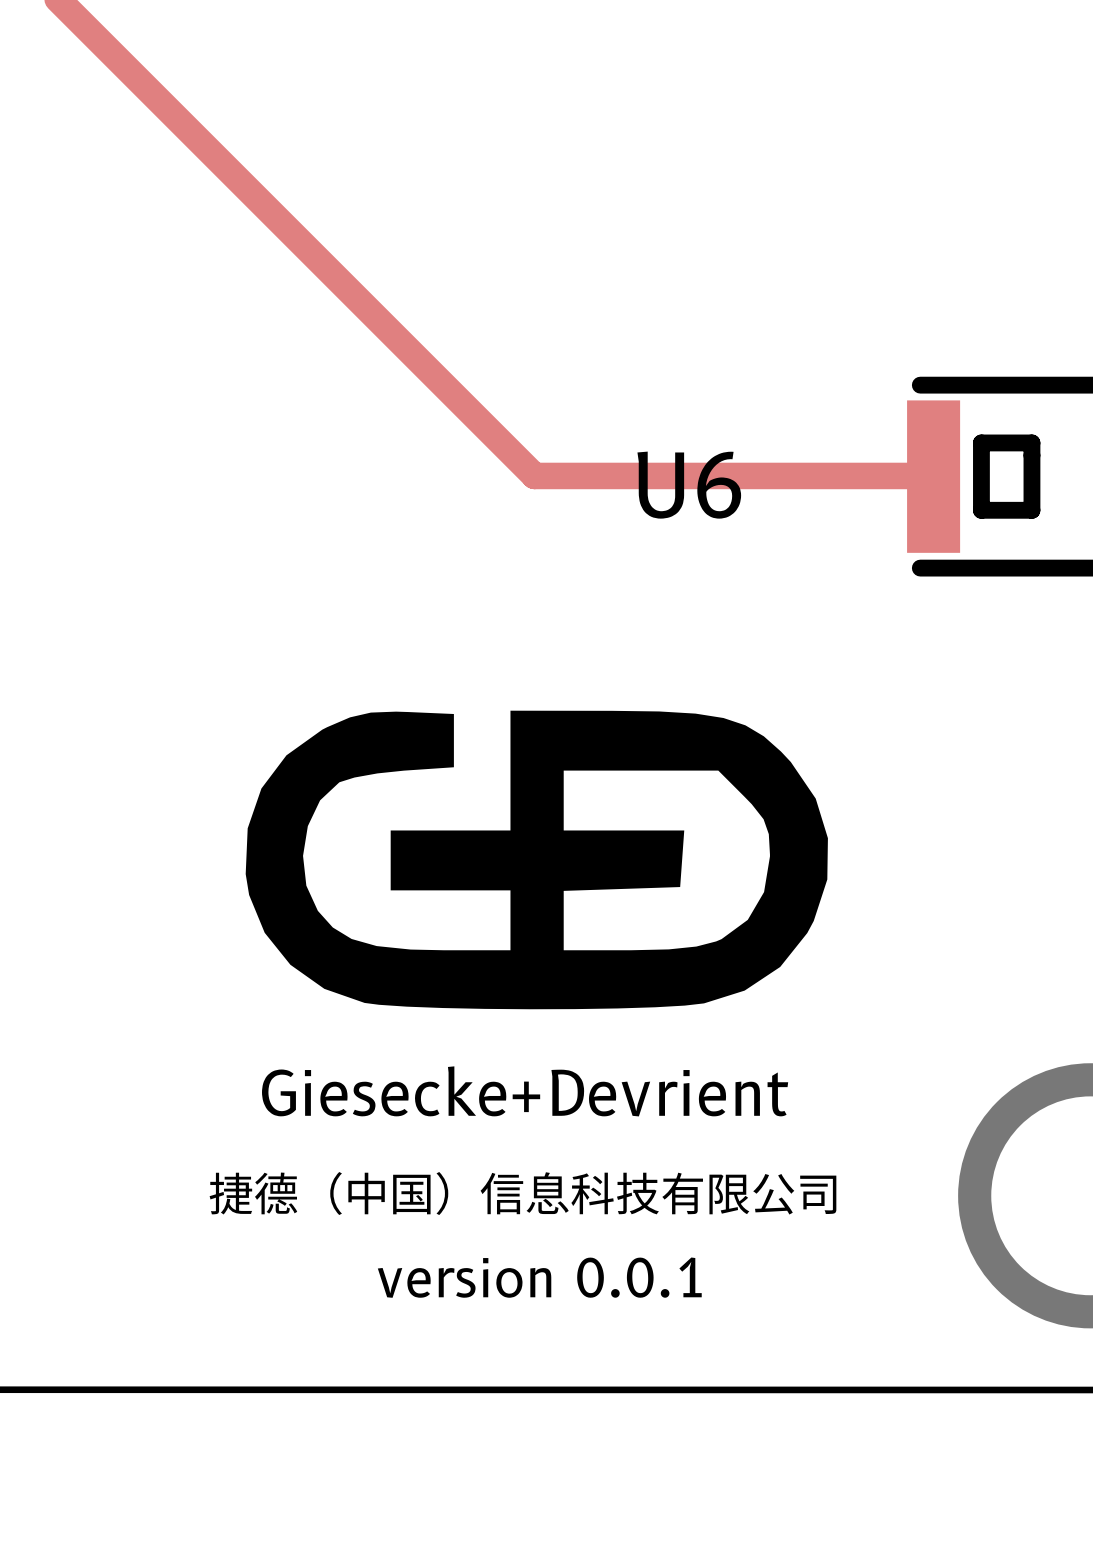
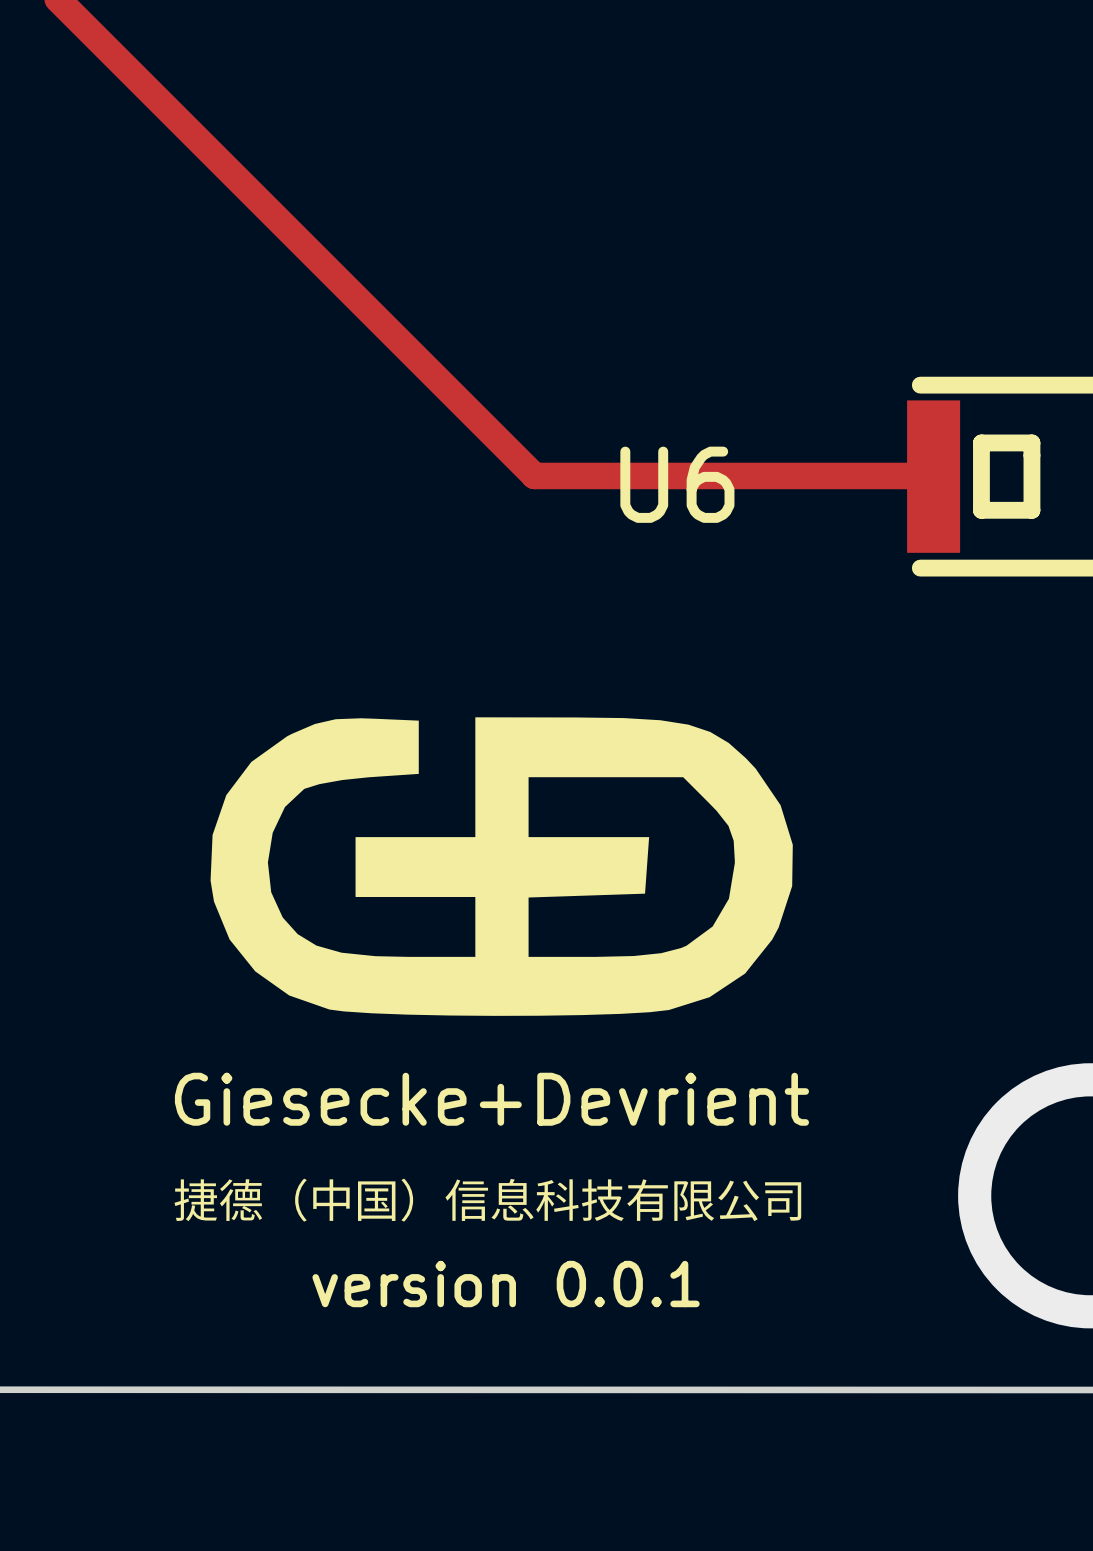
drawing position: (536, 859) -> (501, 866)
text position: Giesecke+Devrient (525, 1091) -> Giesecke+Devrient (491, 1099)
text position: 捷德（中国）信息科技有限公司 (522, 1193) -> 捷德（中国）信息科技有限公司 (487, 1200)
text position: version 0.0.1 (539, 1277) -> version 0.0.1 (506, 1284)

